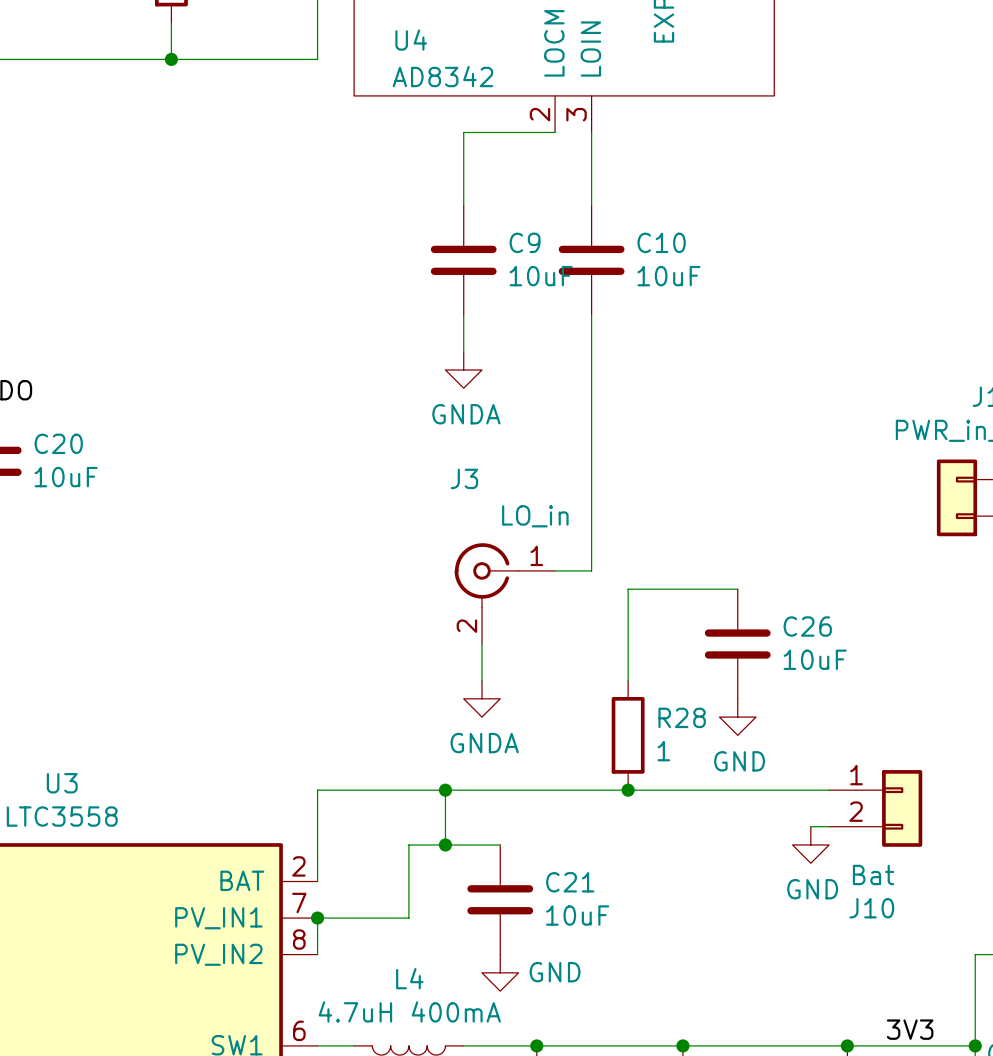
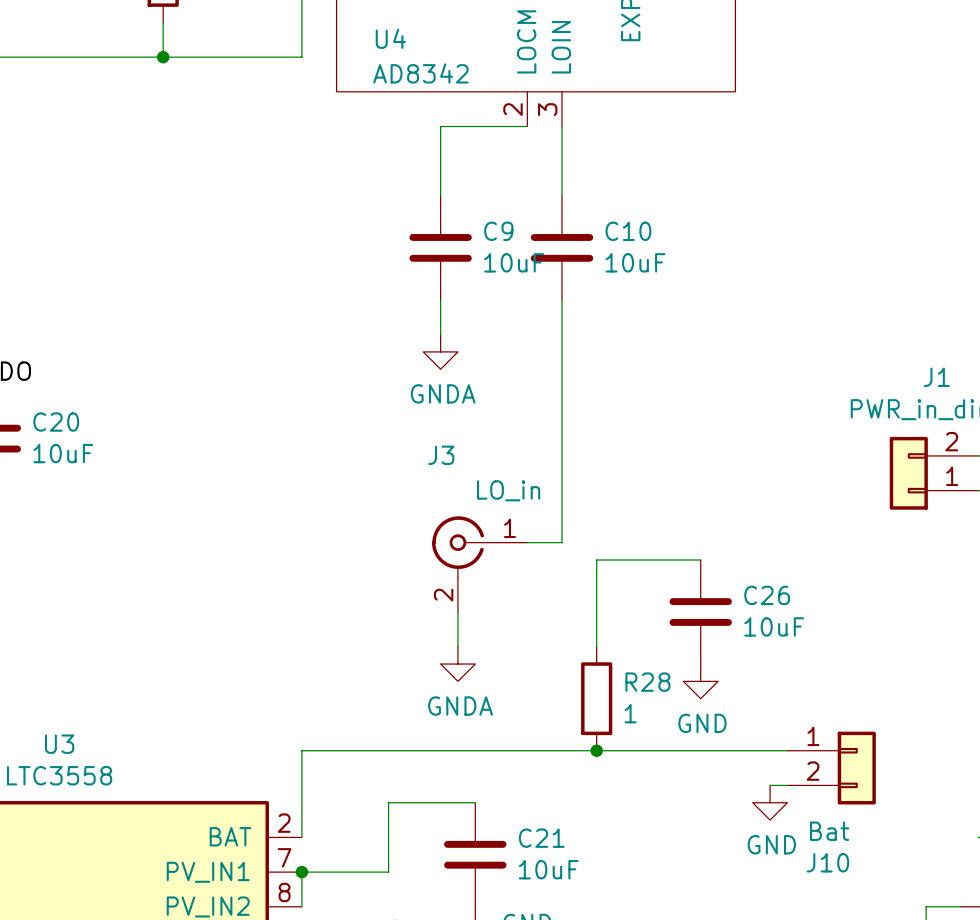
wire: (445, 790) (445, 844) -> none
junction: (445, 790) -> none
junction: (445, 844) -> none

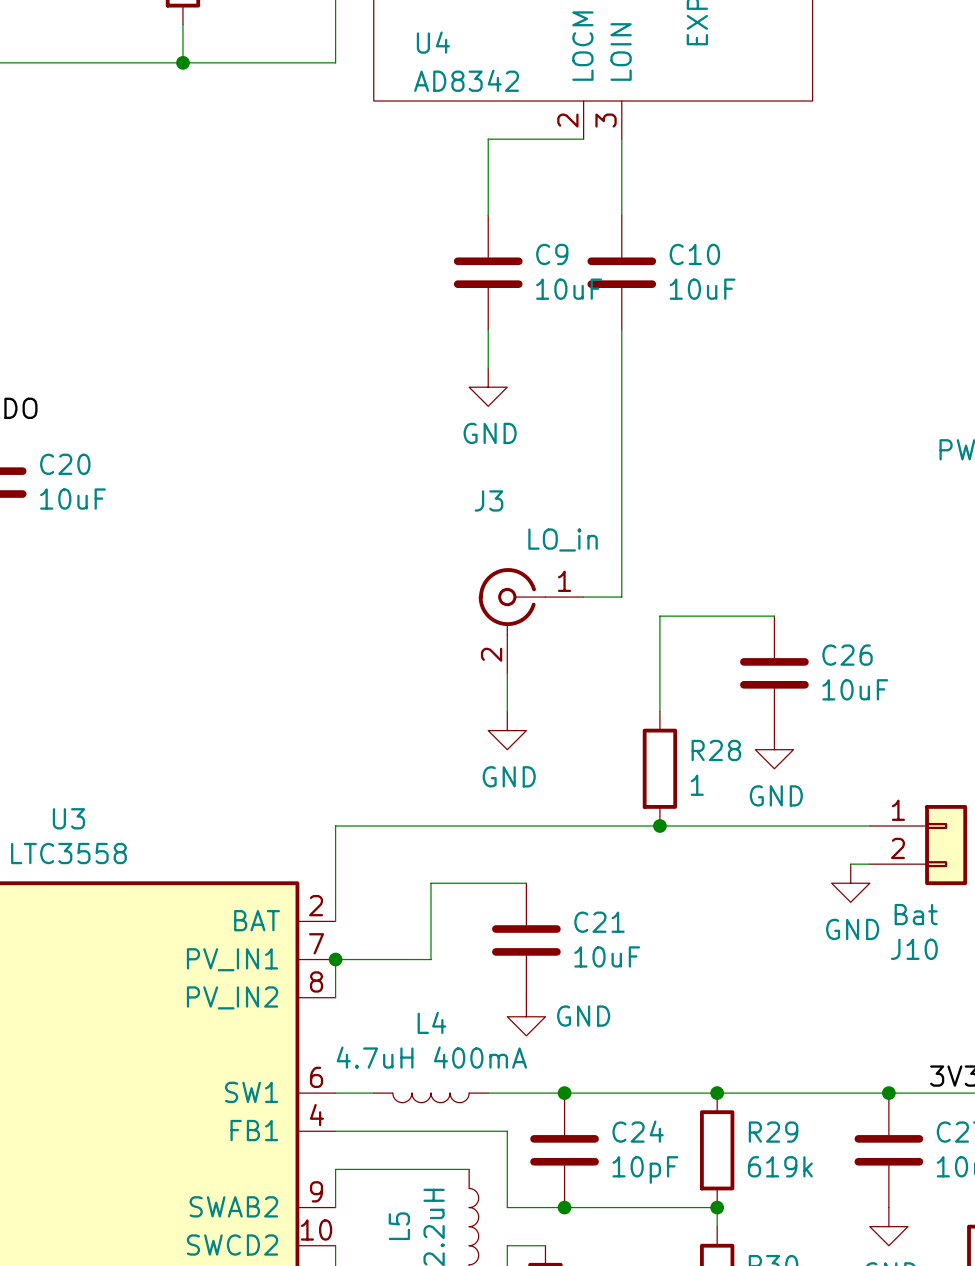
power symbol: GNDA (440, 351) -> GND (488, 387)
power symbol: GNDA (457, 664) -> GND (507, 730)

